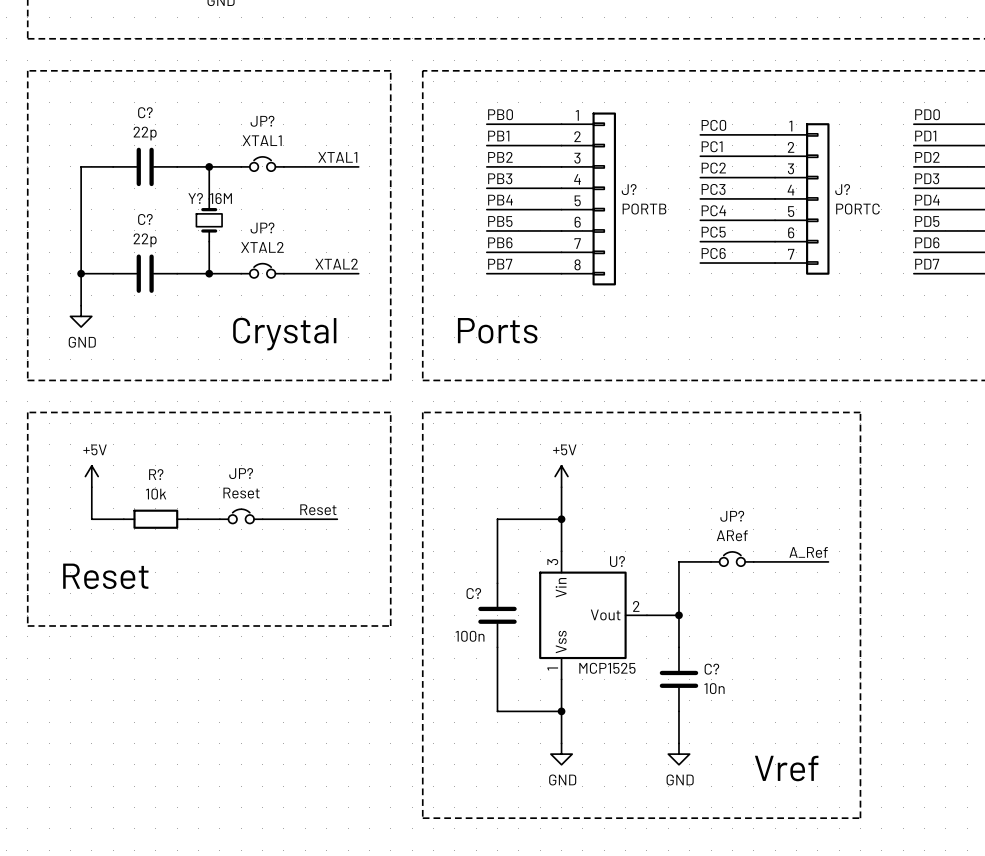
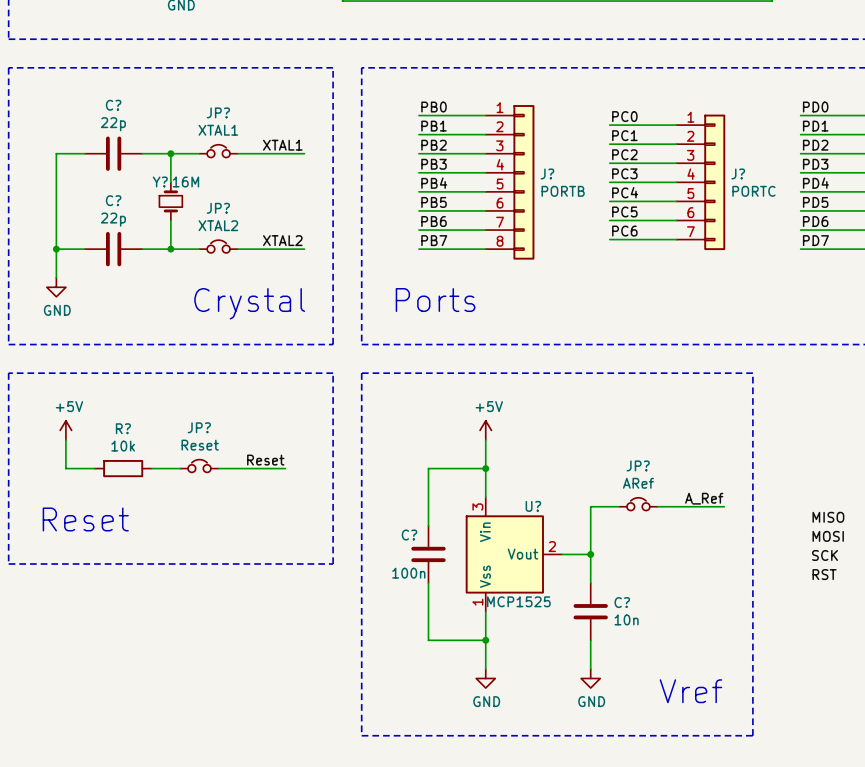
label: none -> MISO (828, 517)
label: none -> MOSI (828, 536)
label: none -> SCK (825, 555)
label: none -> RST (824, 574)

